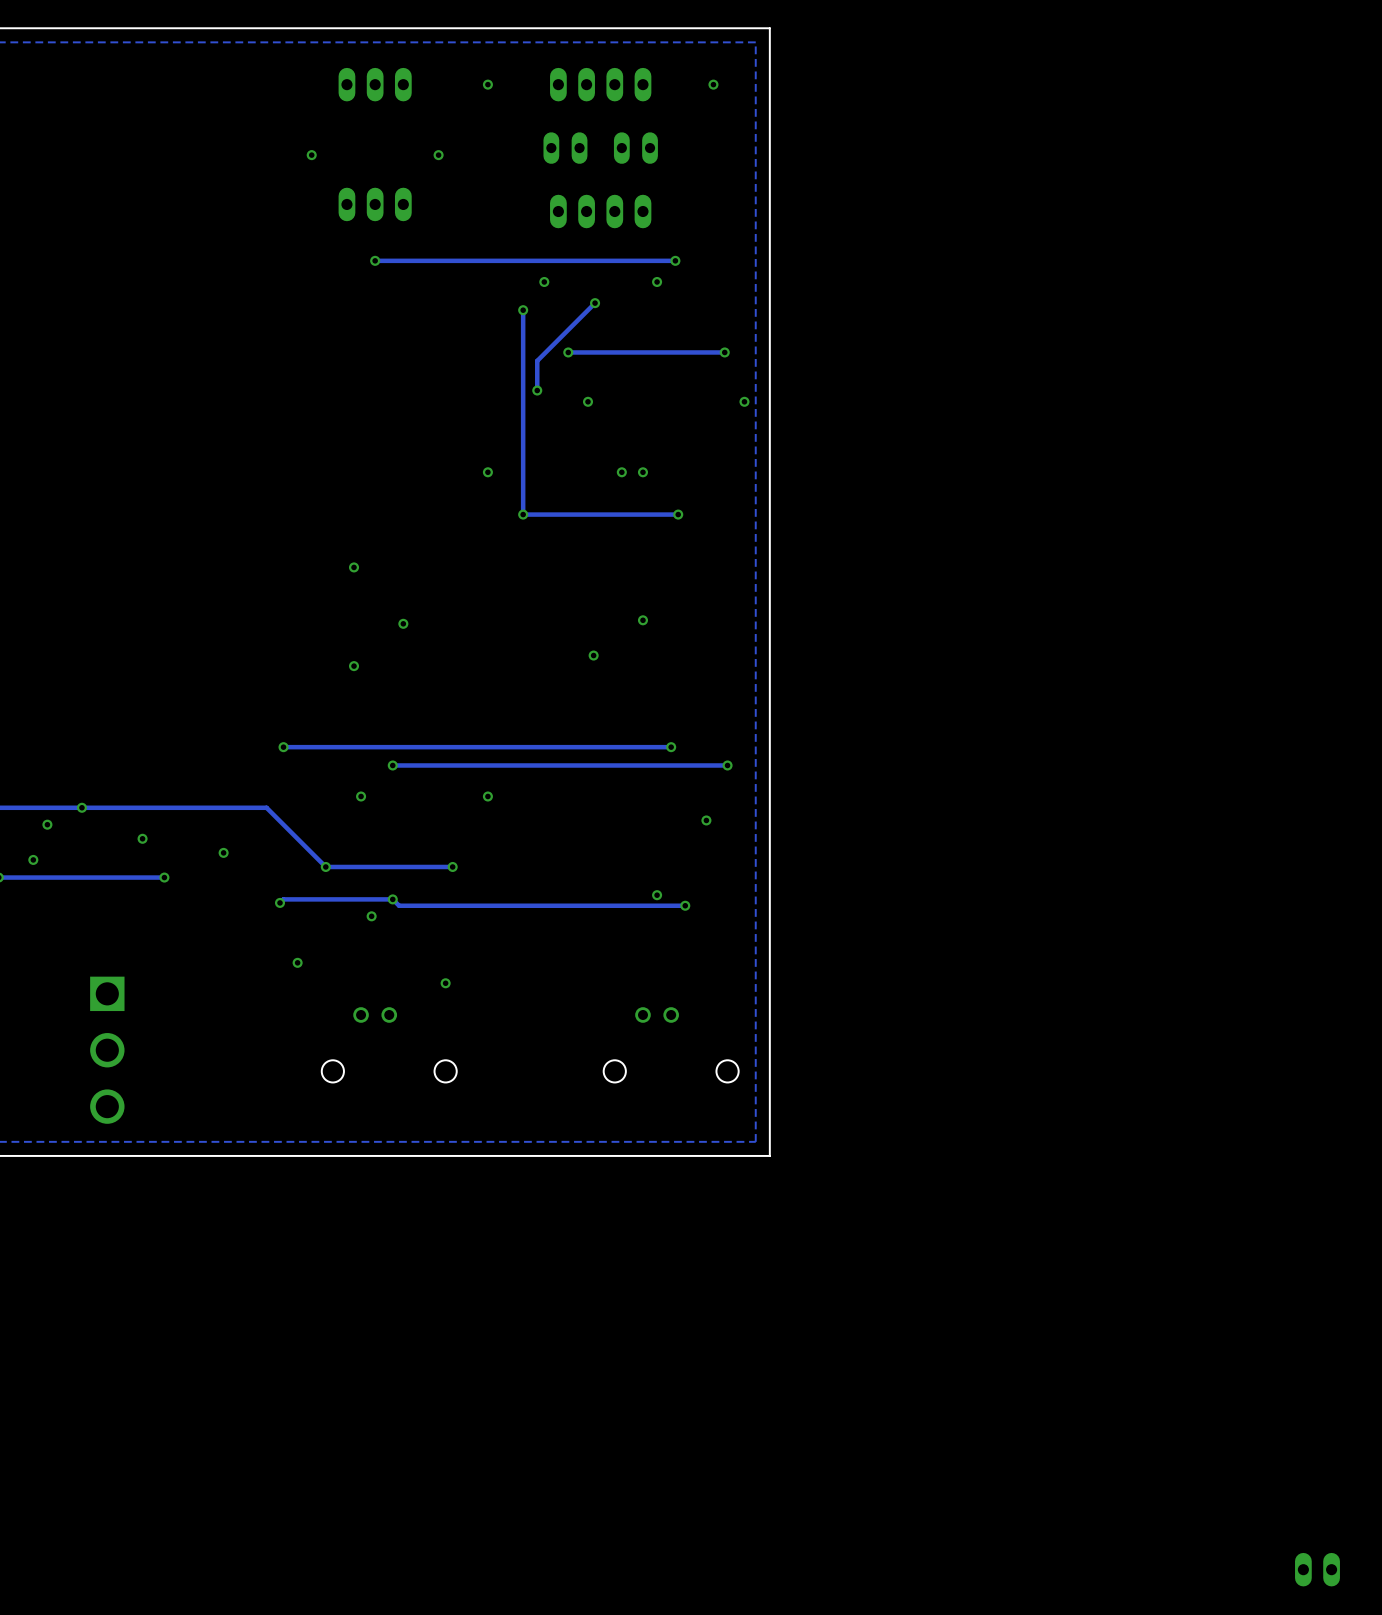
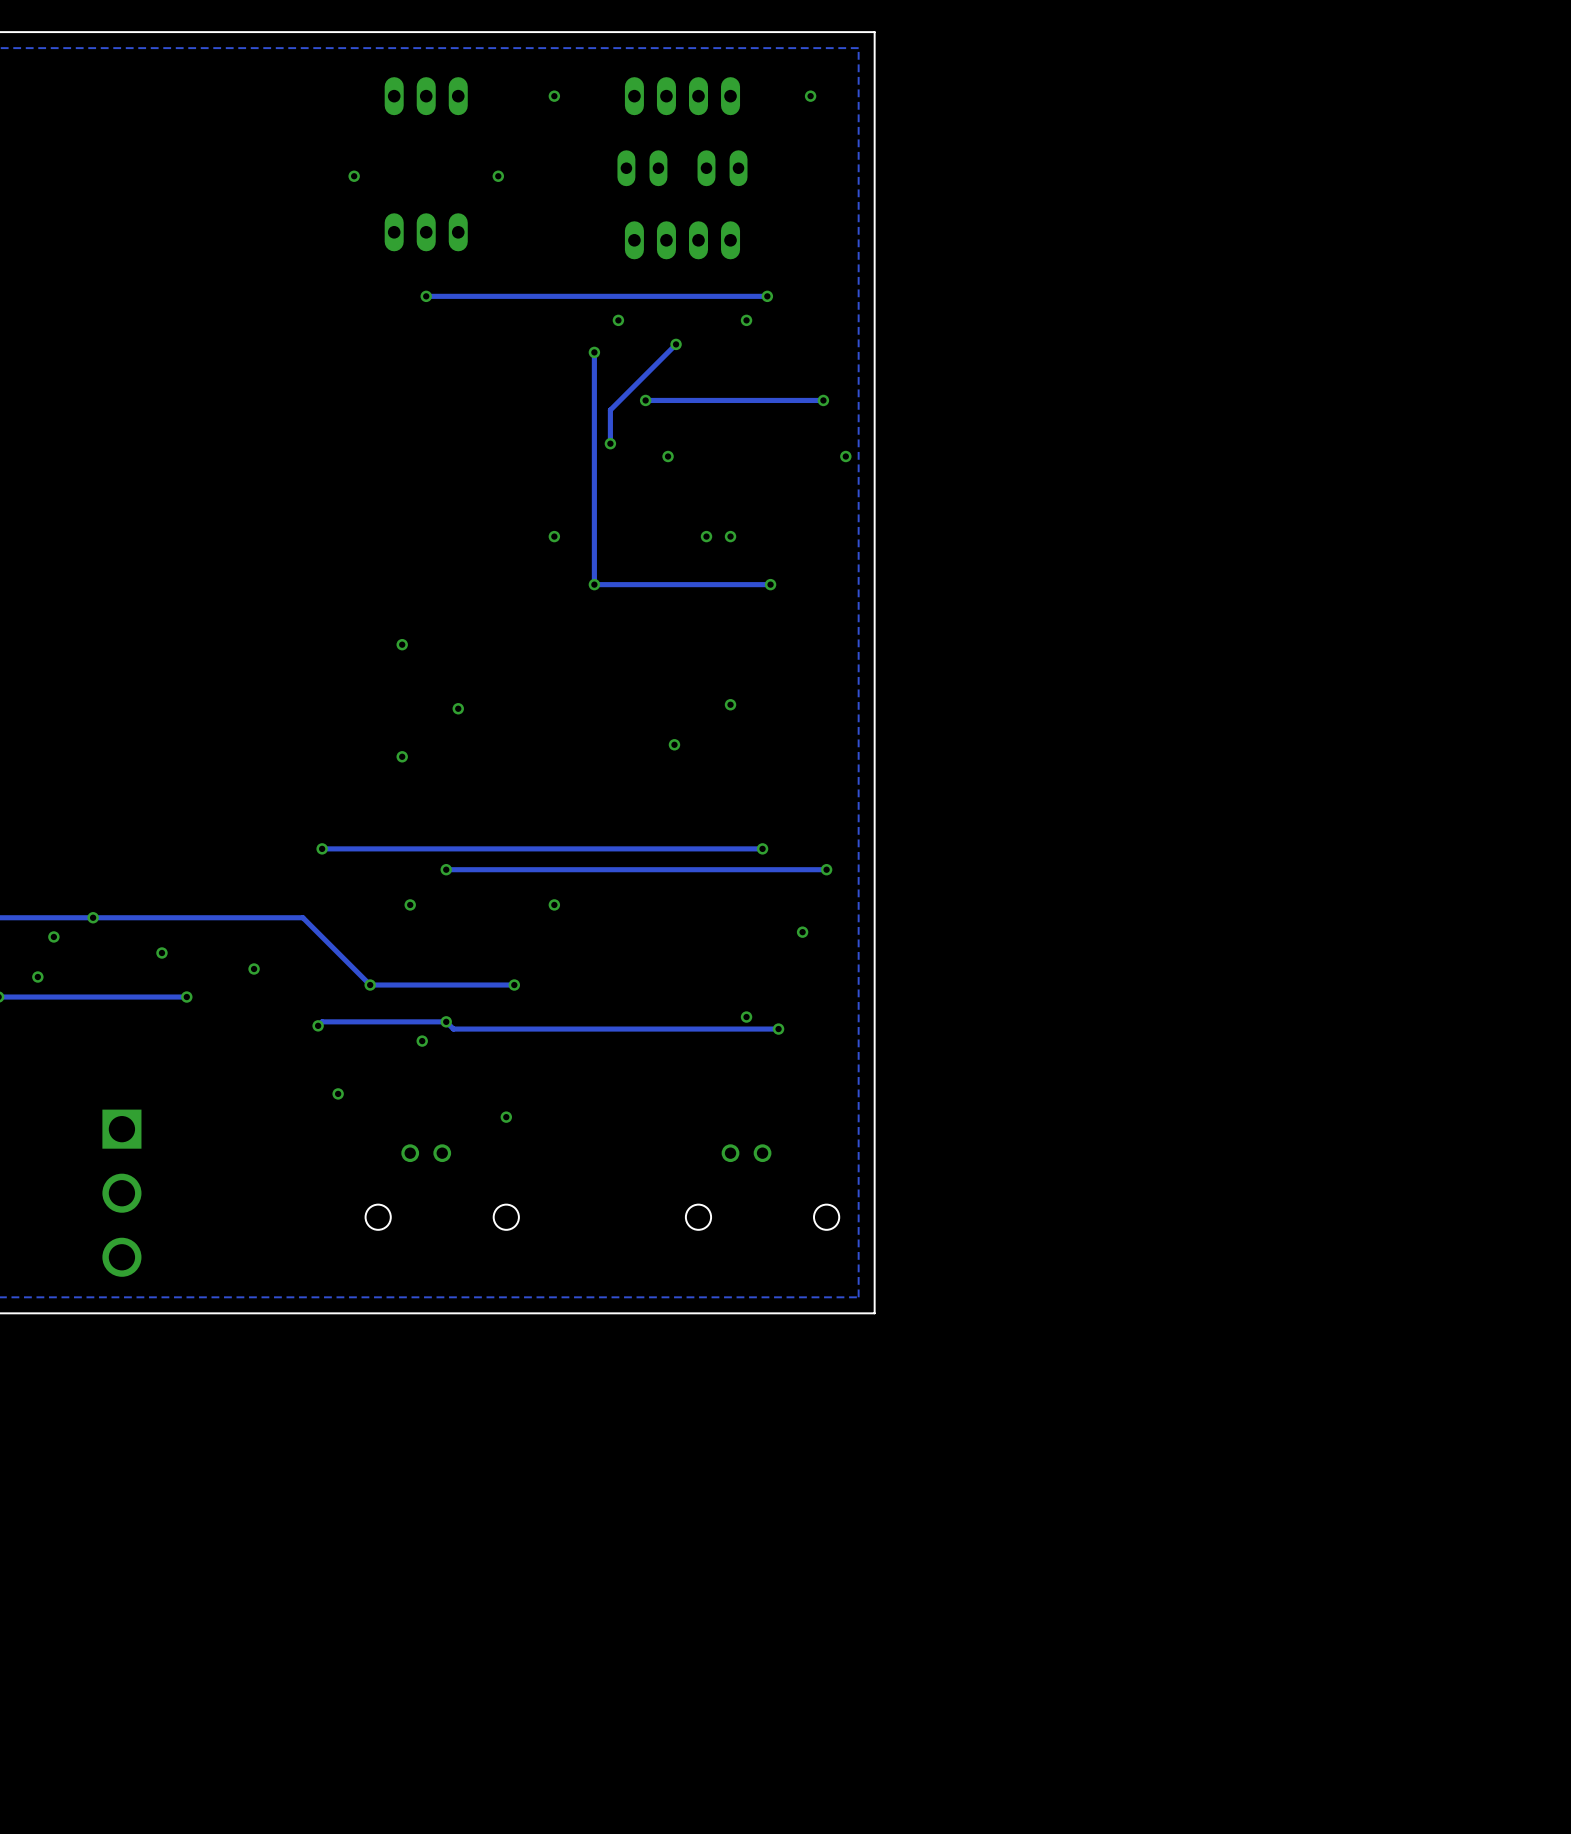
part: (1317, 1569) -> none

